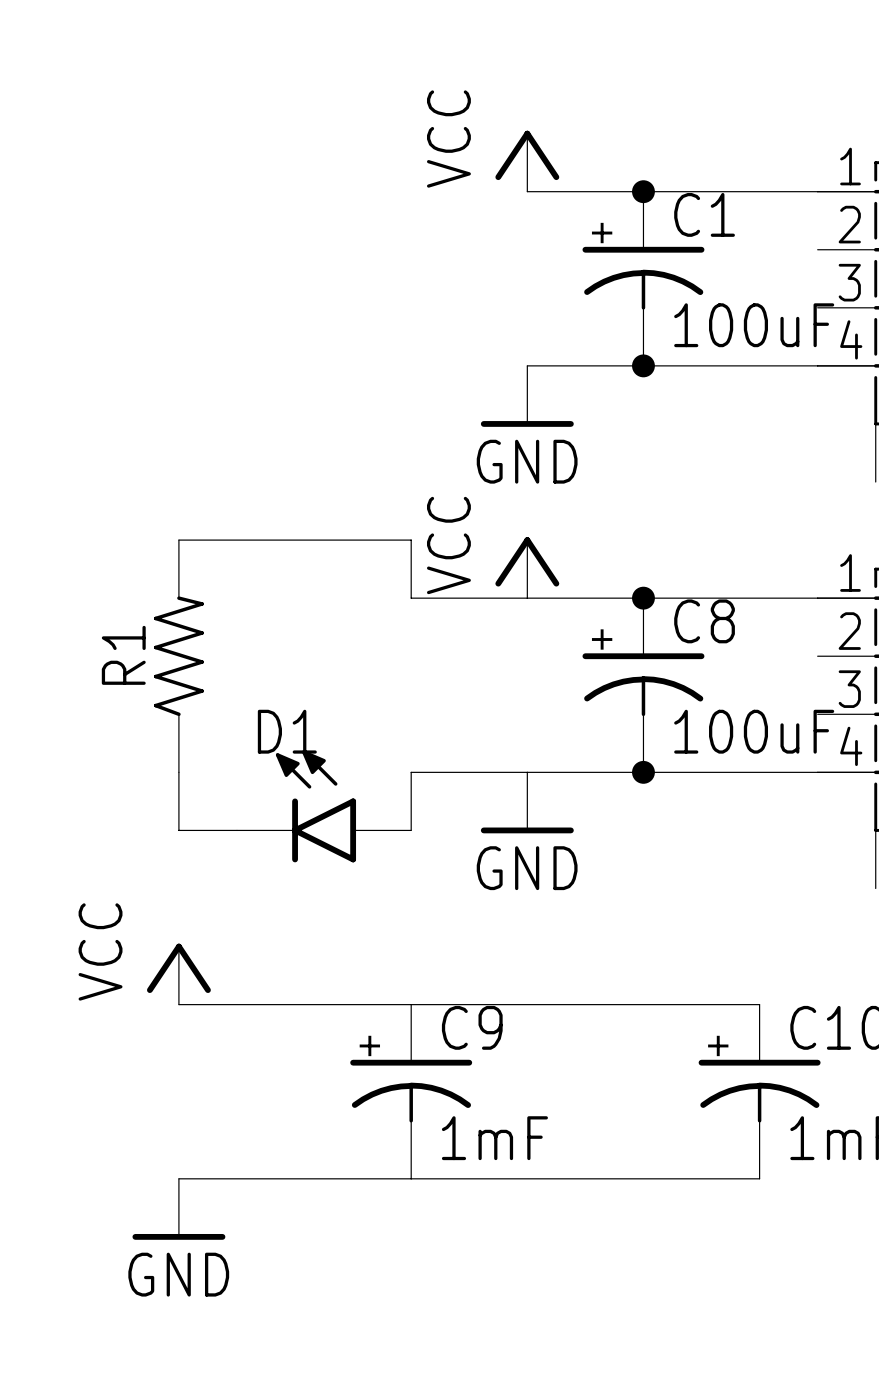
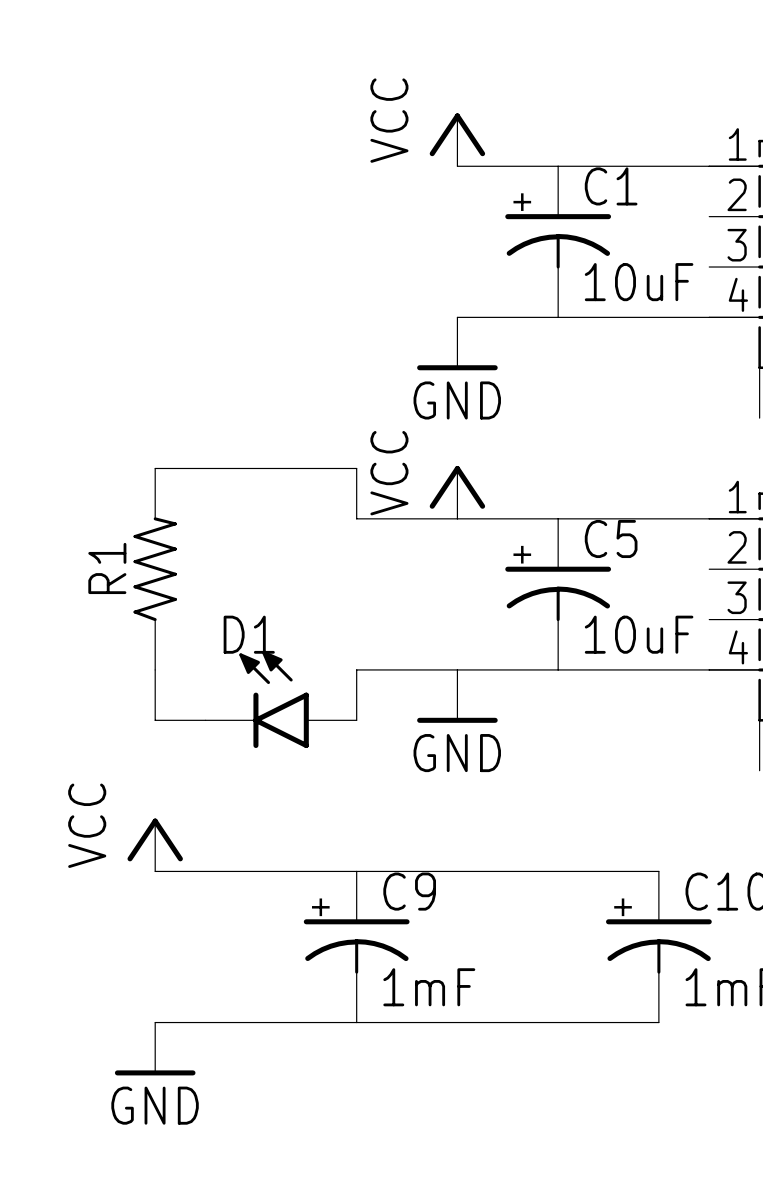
junction: (643, 191) -> none
C1 value: 100uF (754, 325) -> 10uF (639, 282)
junction: (643, 365) -> none
junction: (643, 598) -> none
C8 name: C8 (704, 621) -> C5 (611, 539)
C8 value: 100uF (754, 731) -> 10uF (639, 634)
junction: (643, 772) -> none

